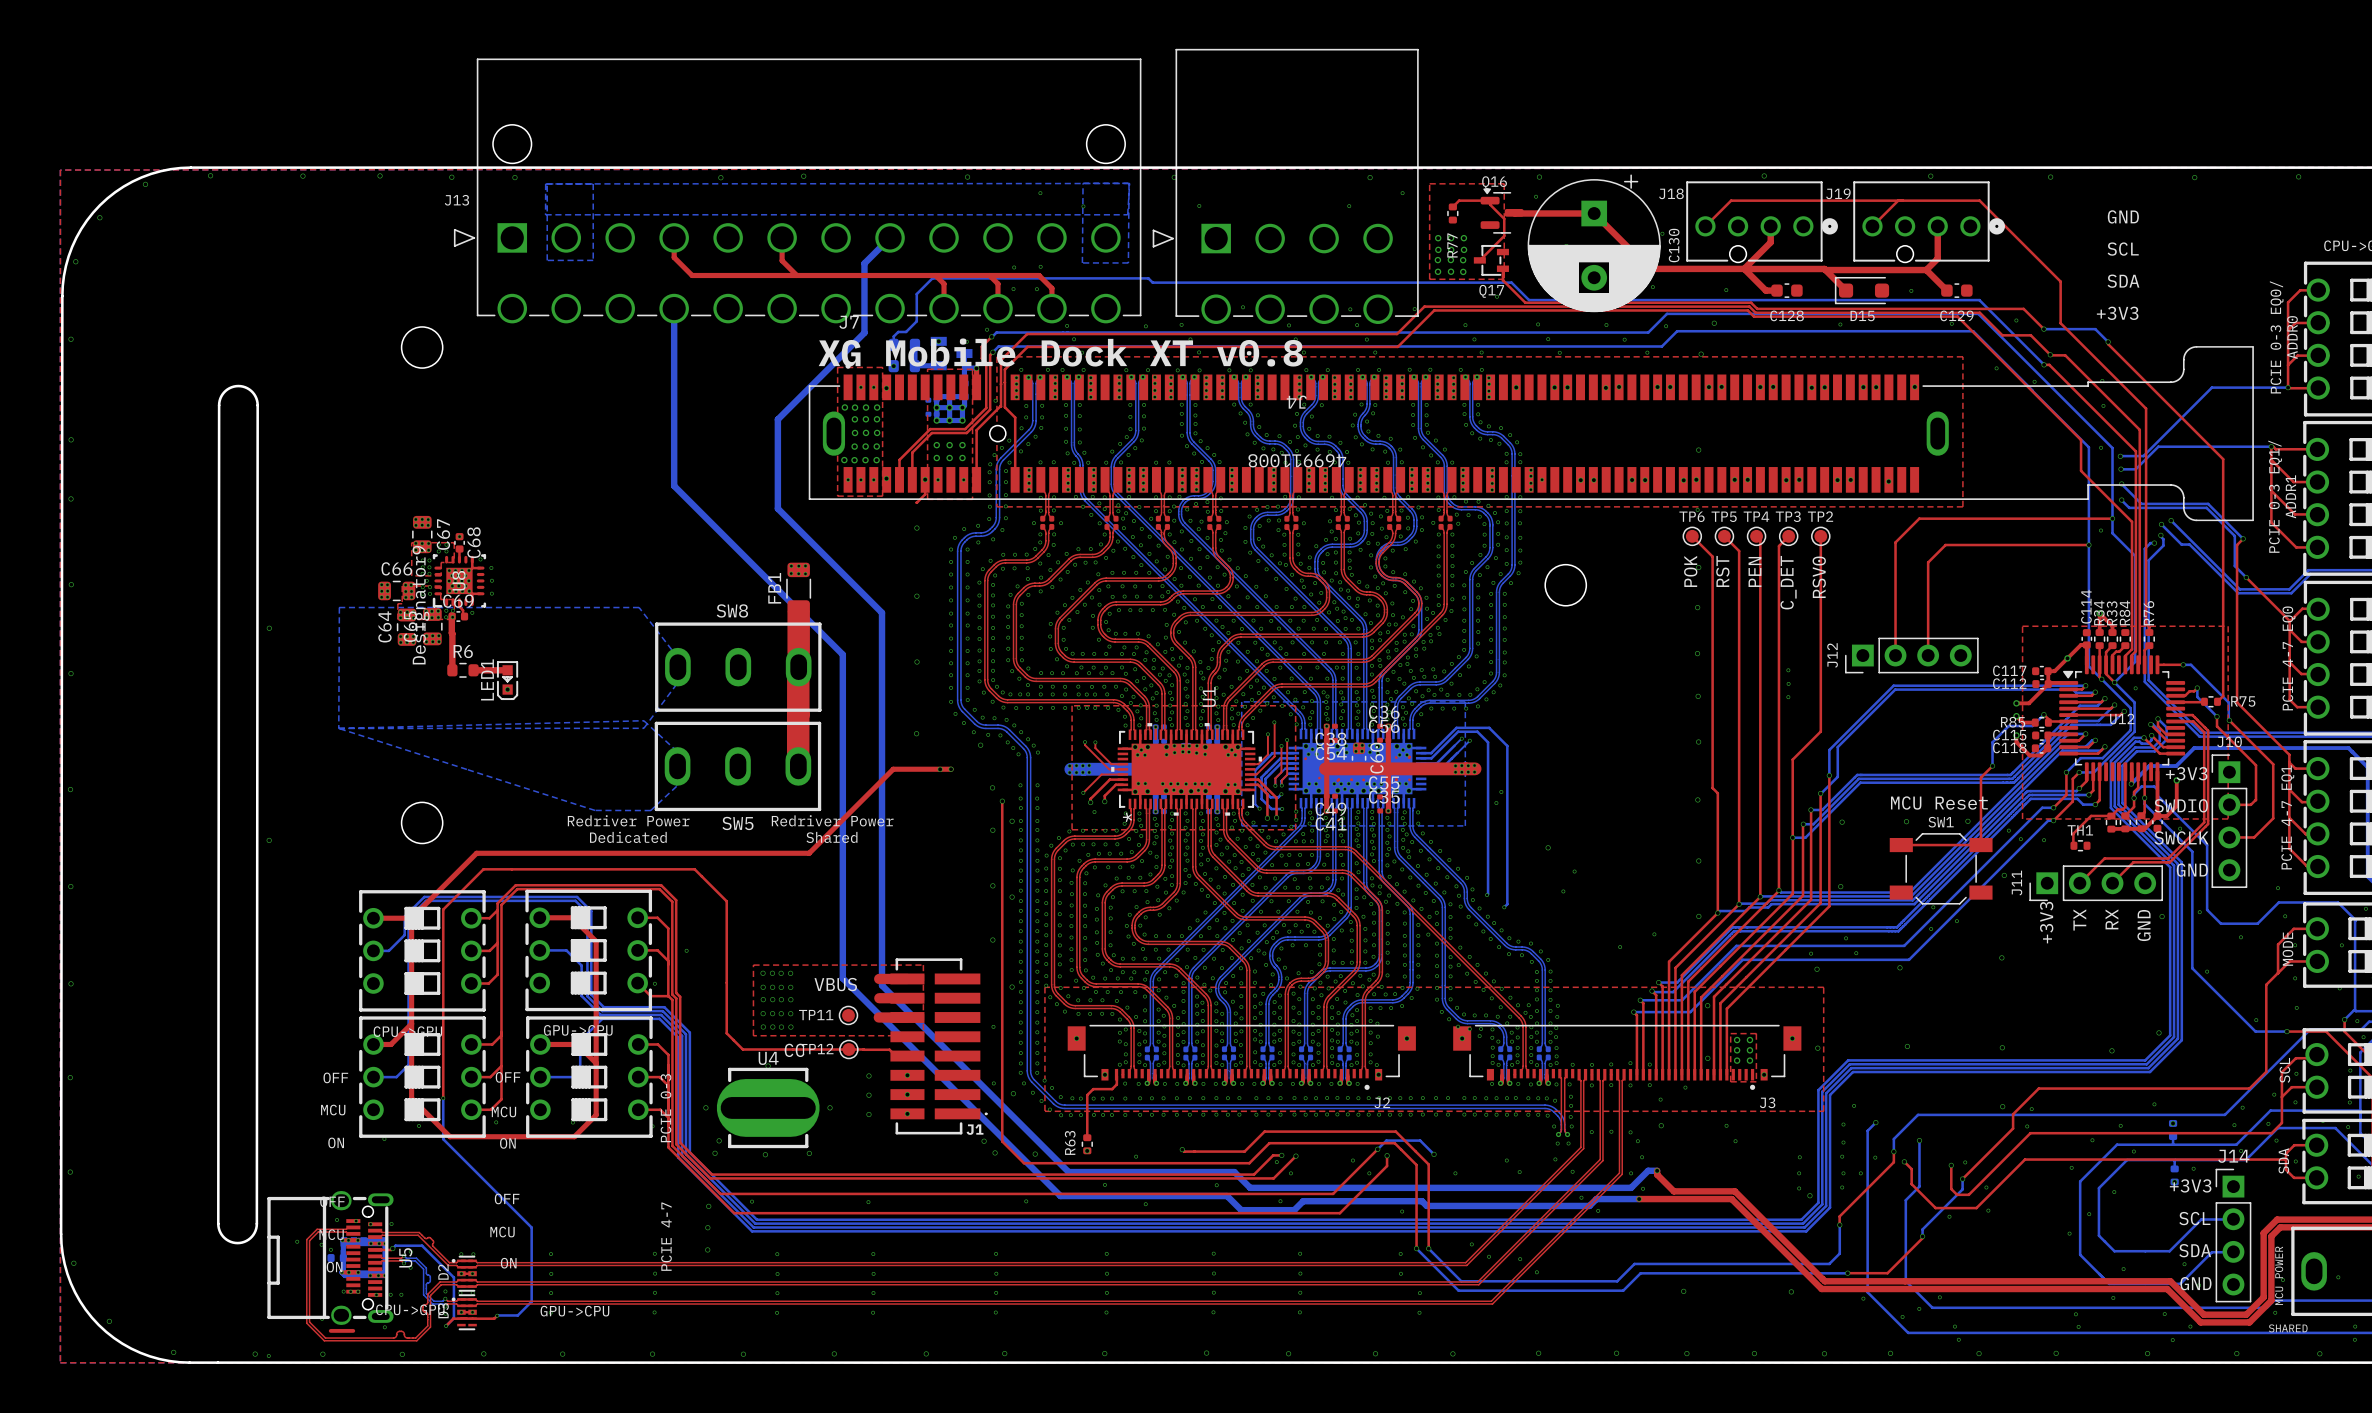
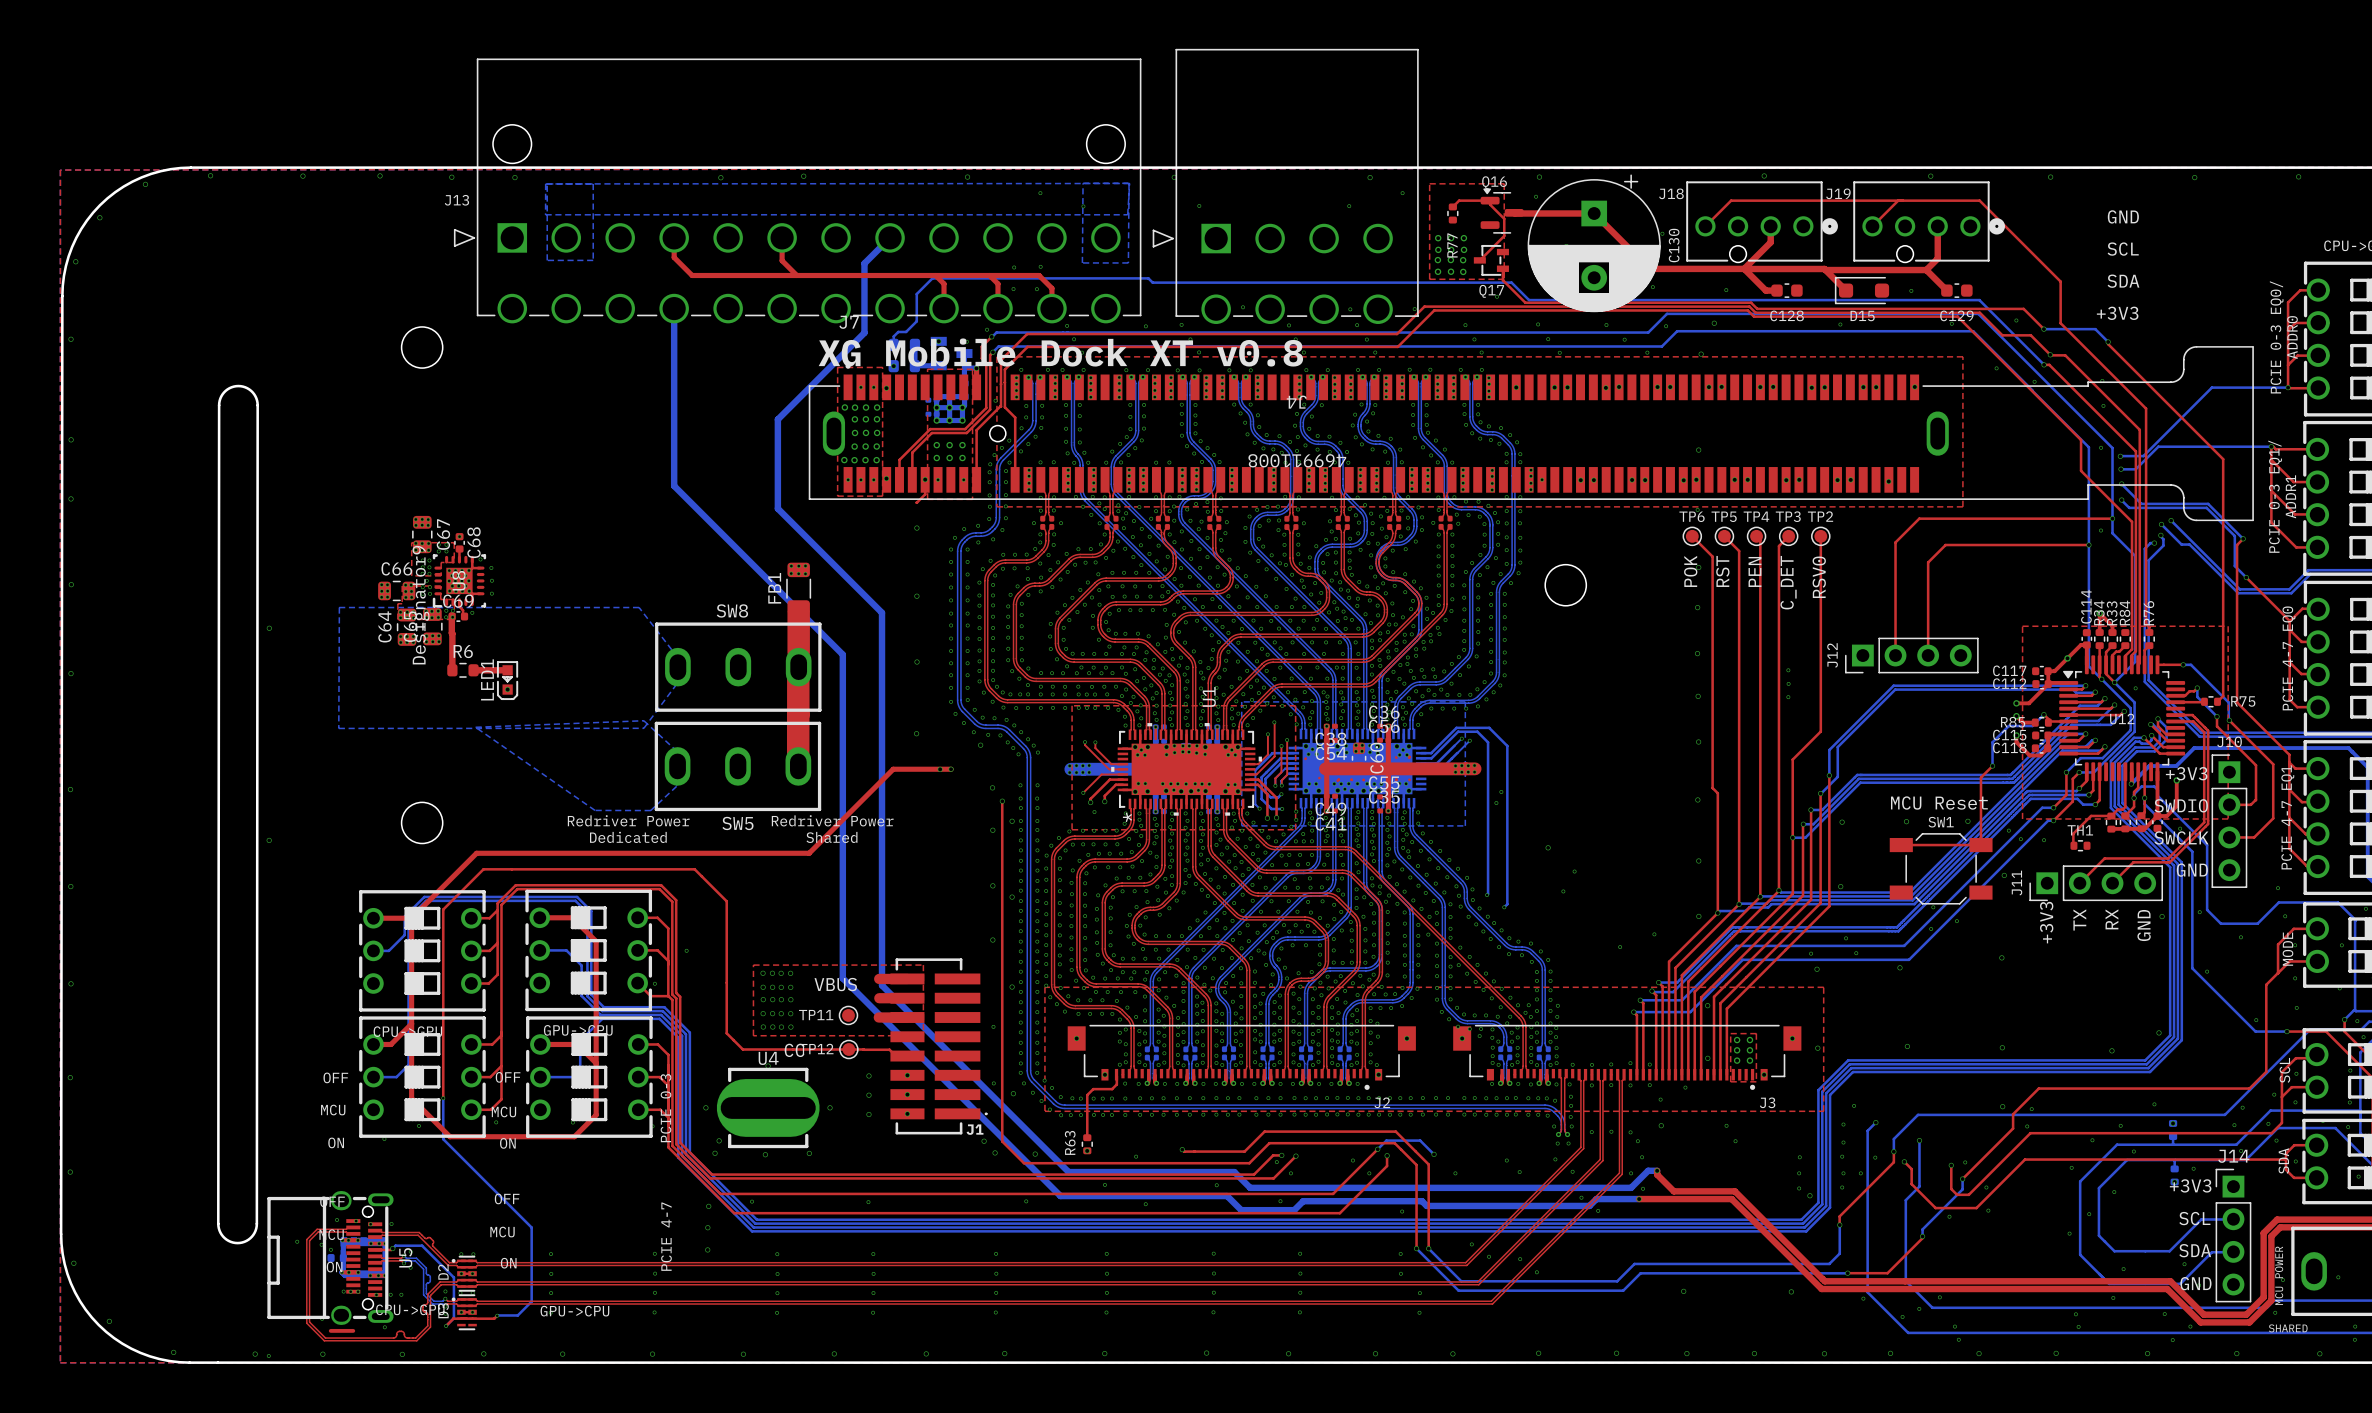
bottom zone outline: (643, 720) (338, 728) (595, 810) -> (643, 720) (475, 727) (595, 810)

